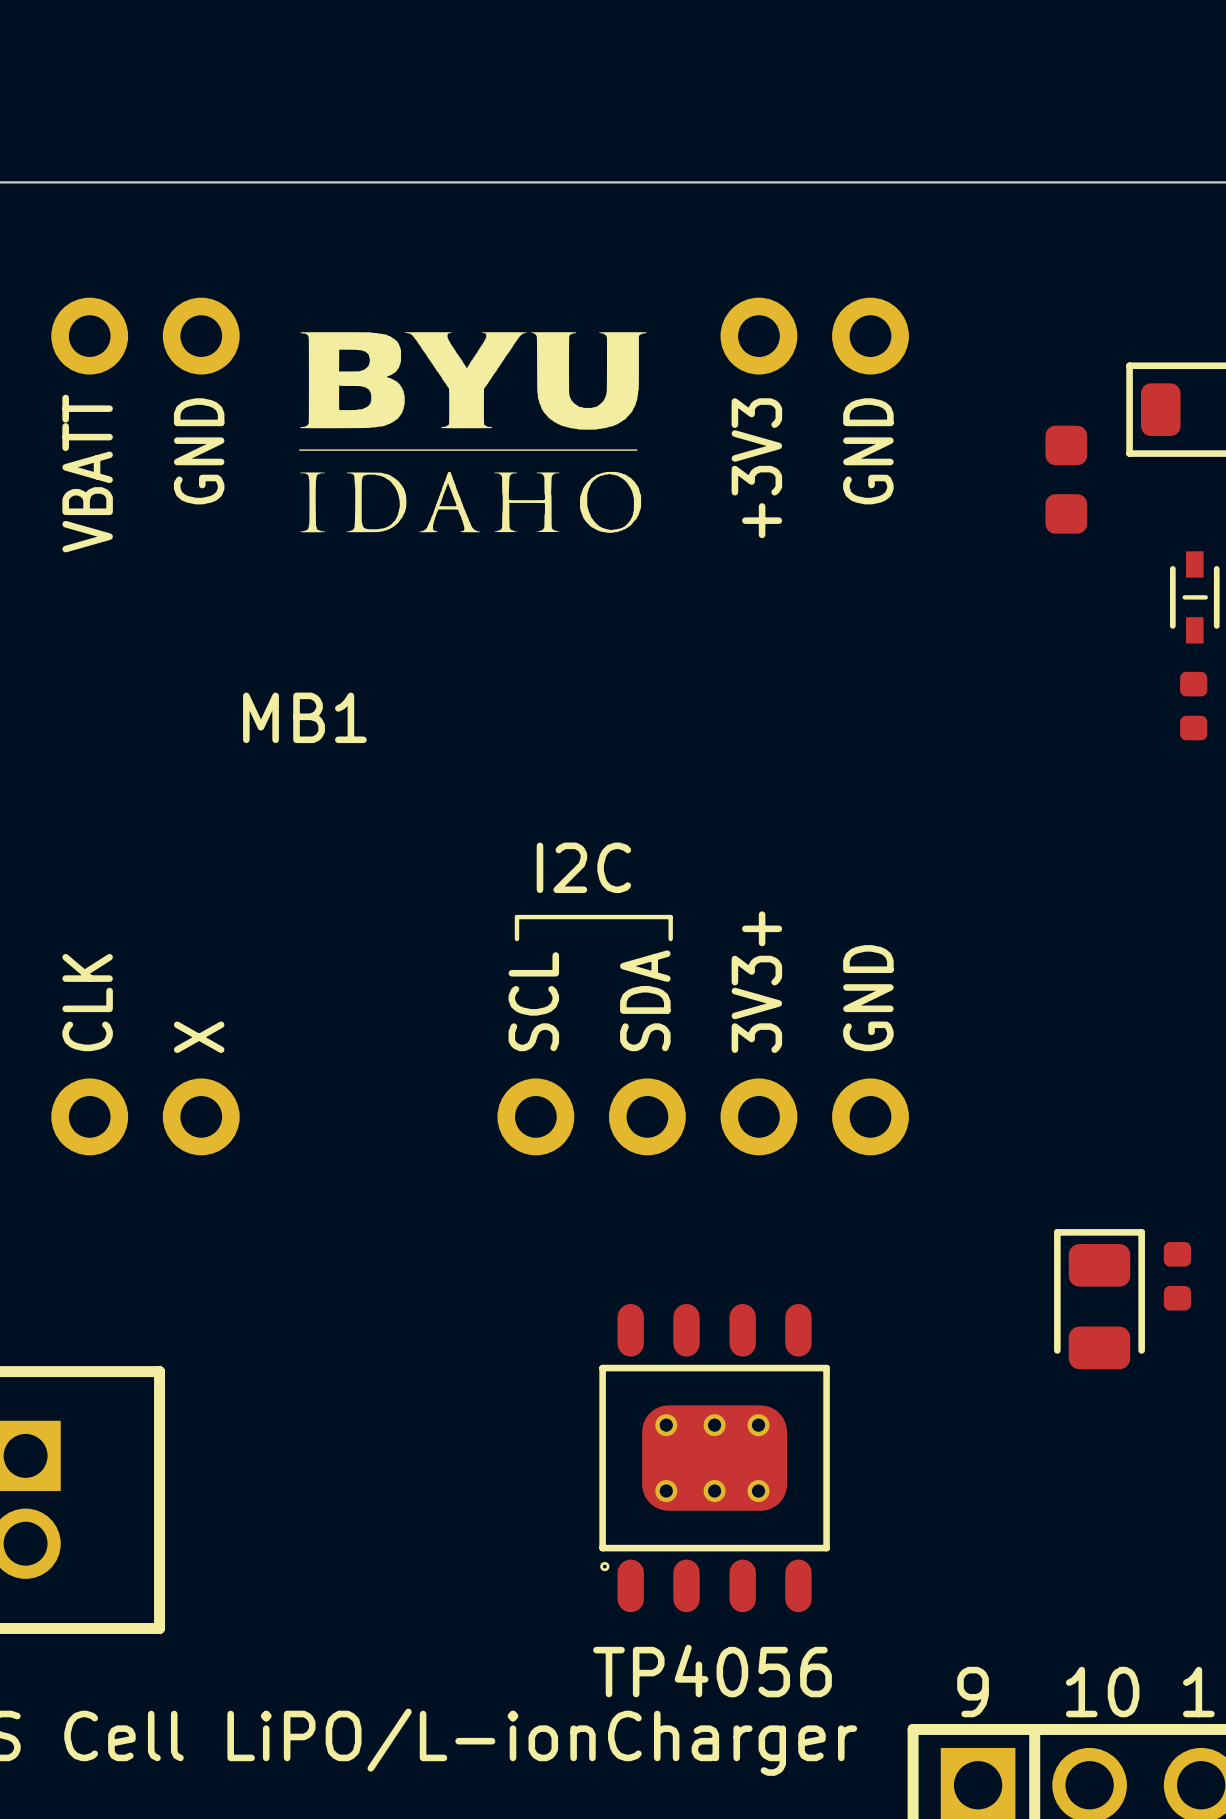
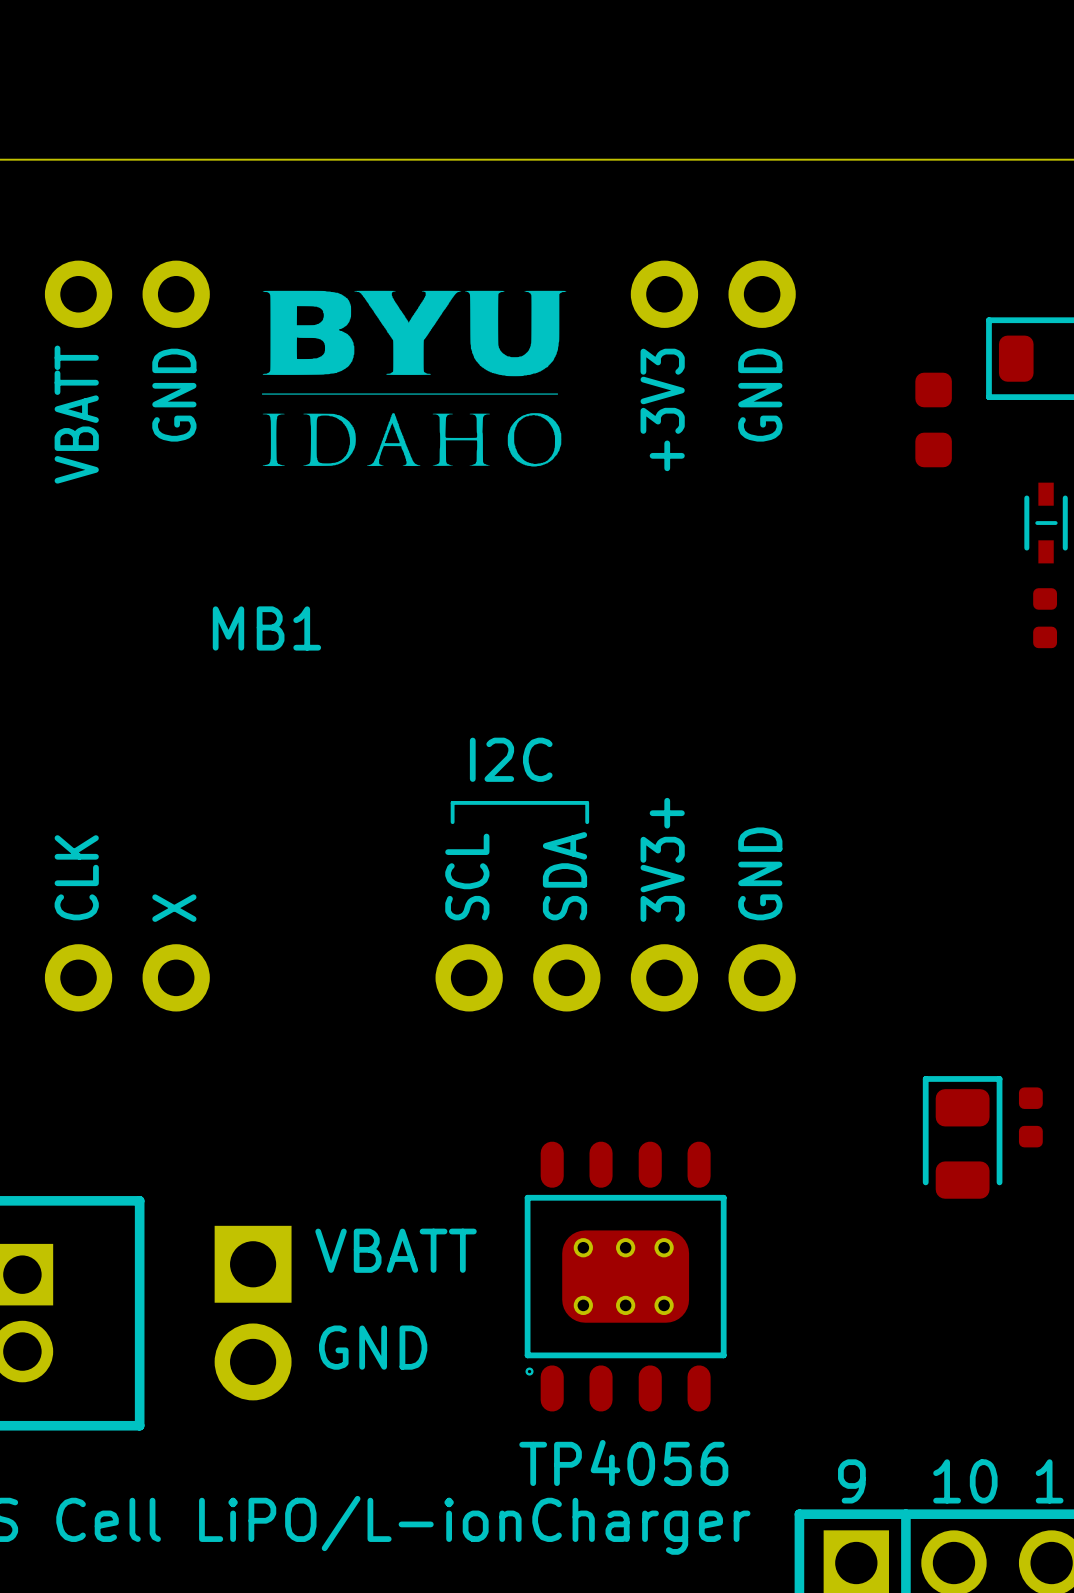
text: none -> VBATT (396, 1250)
part: none -> (253, 1313)
text: none -> GND (373, 1347)

